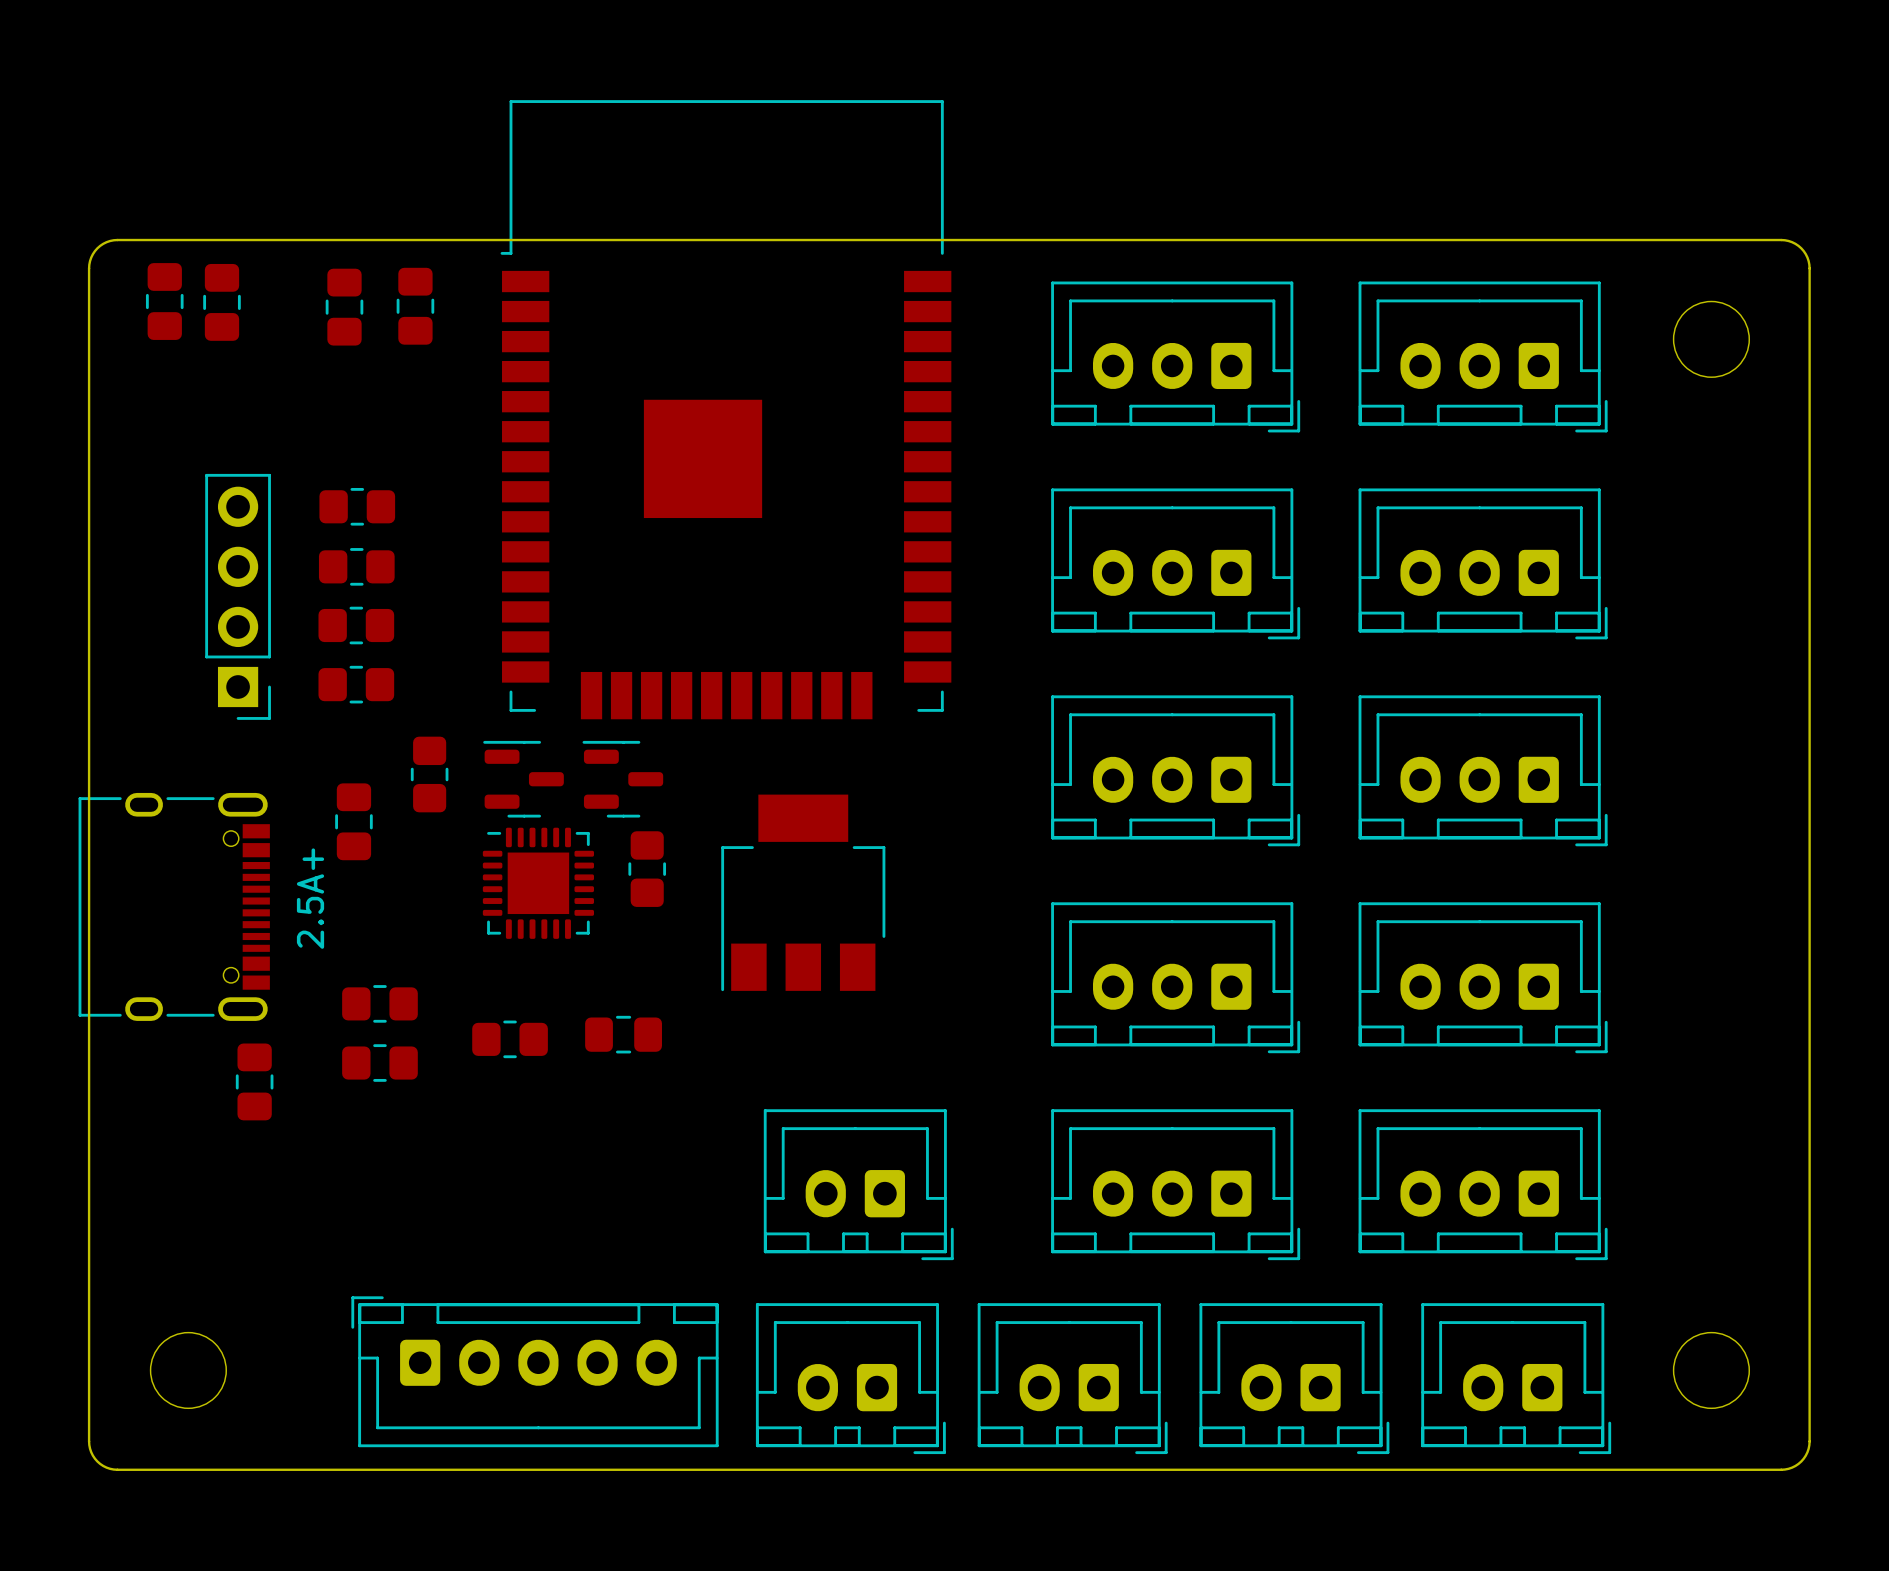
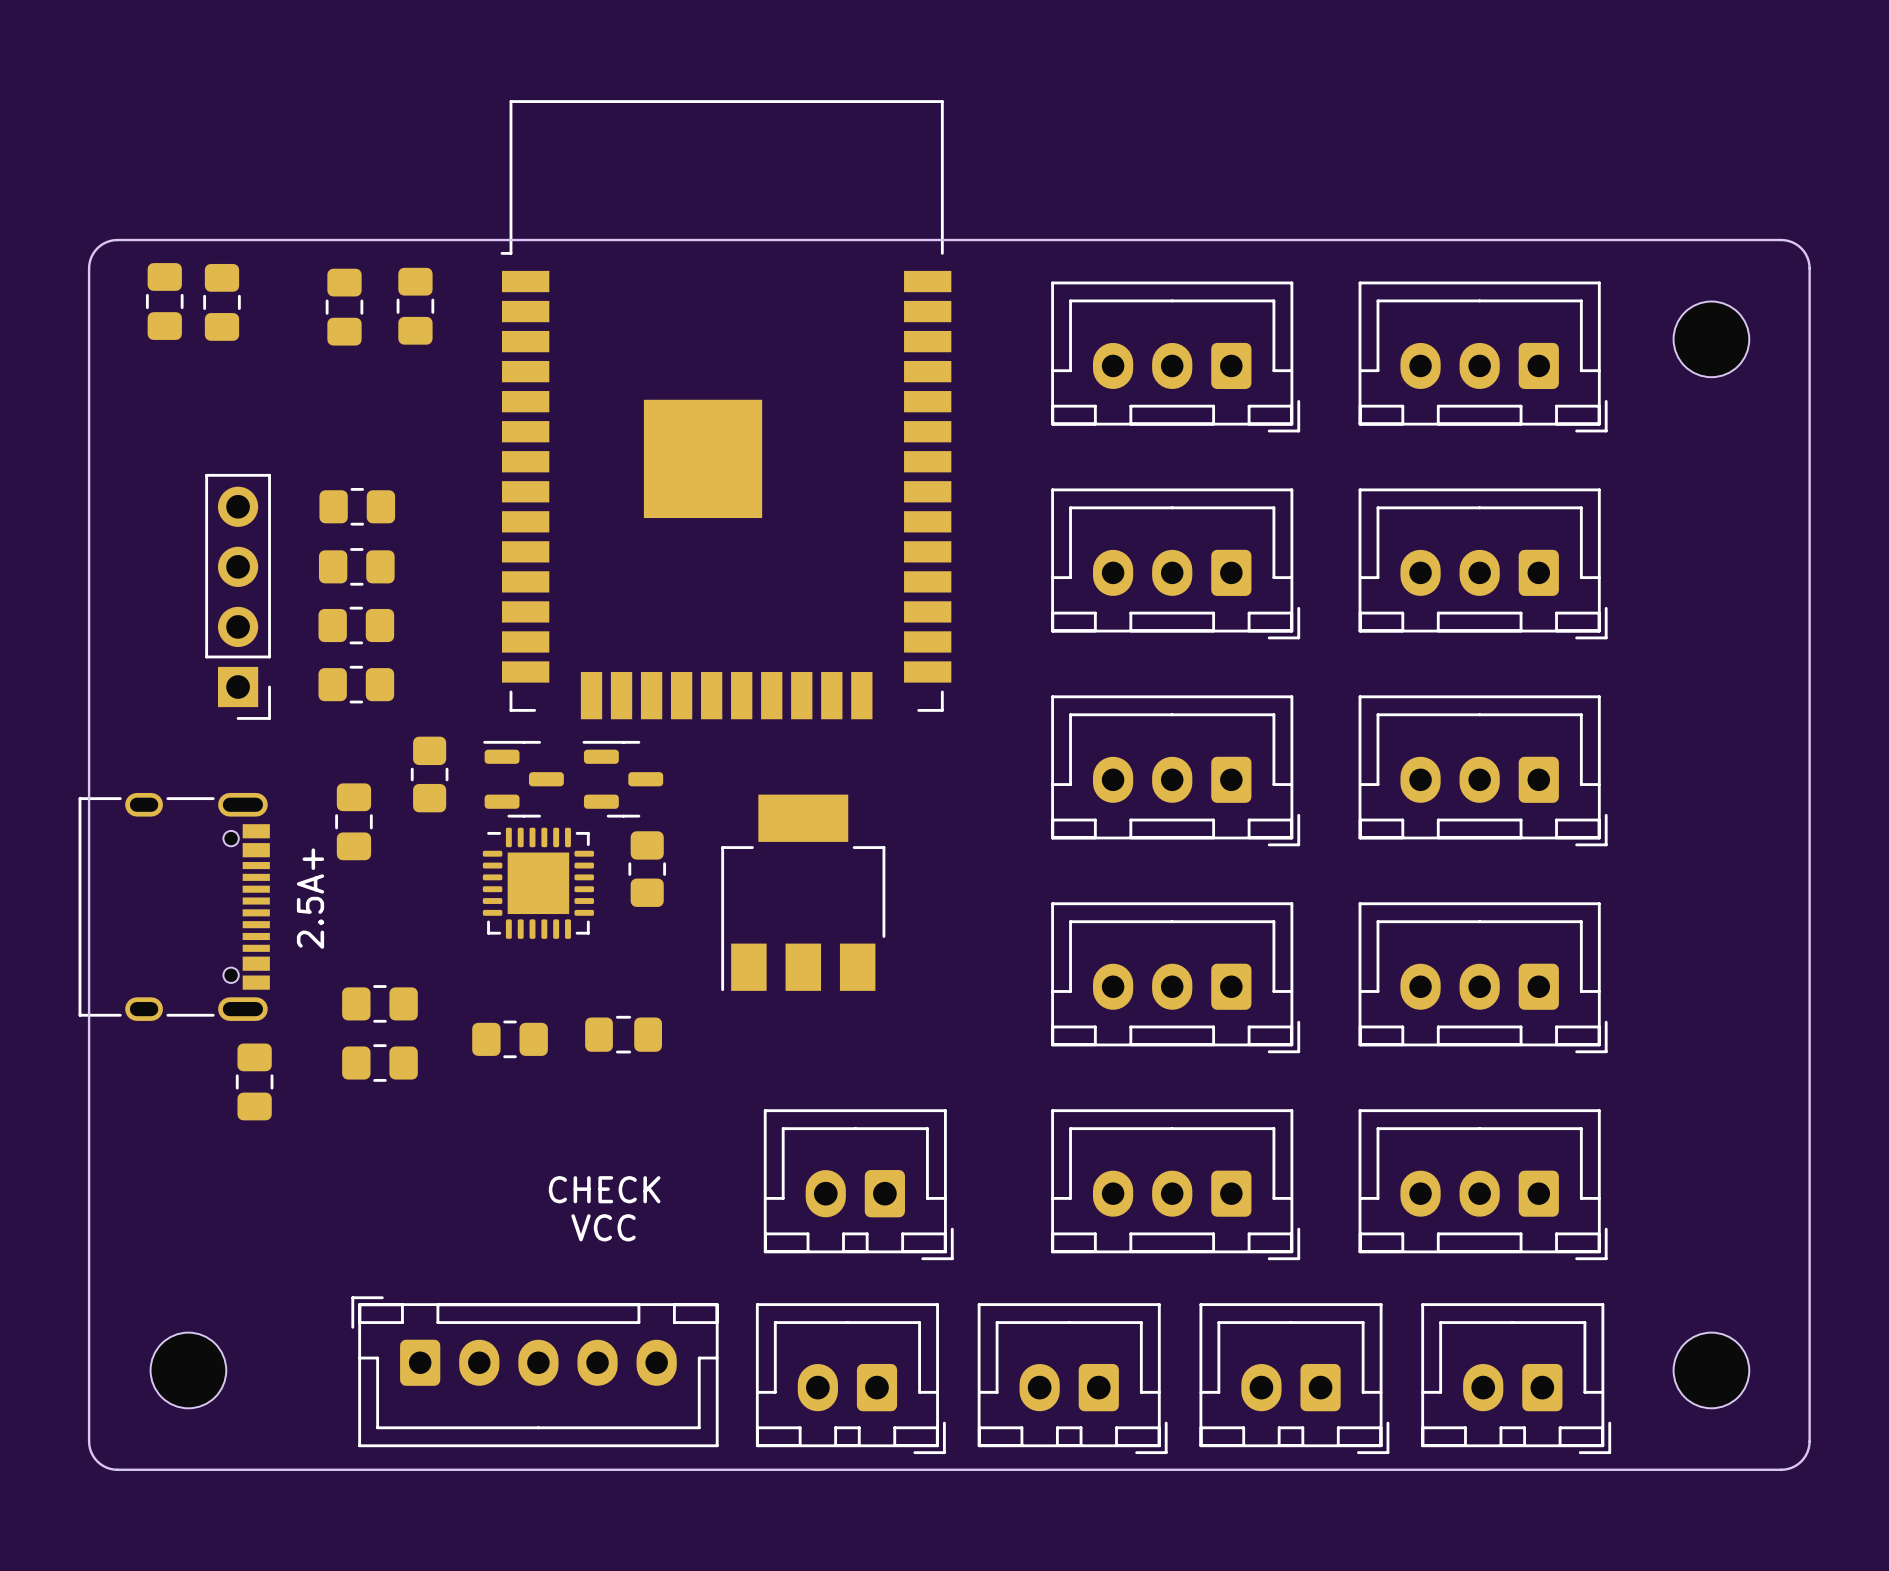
text: none -> CHECK (604, 1189)
text: none -> VCC (603, 1227)

